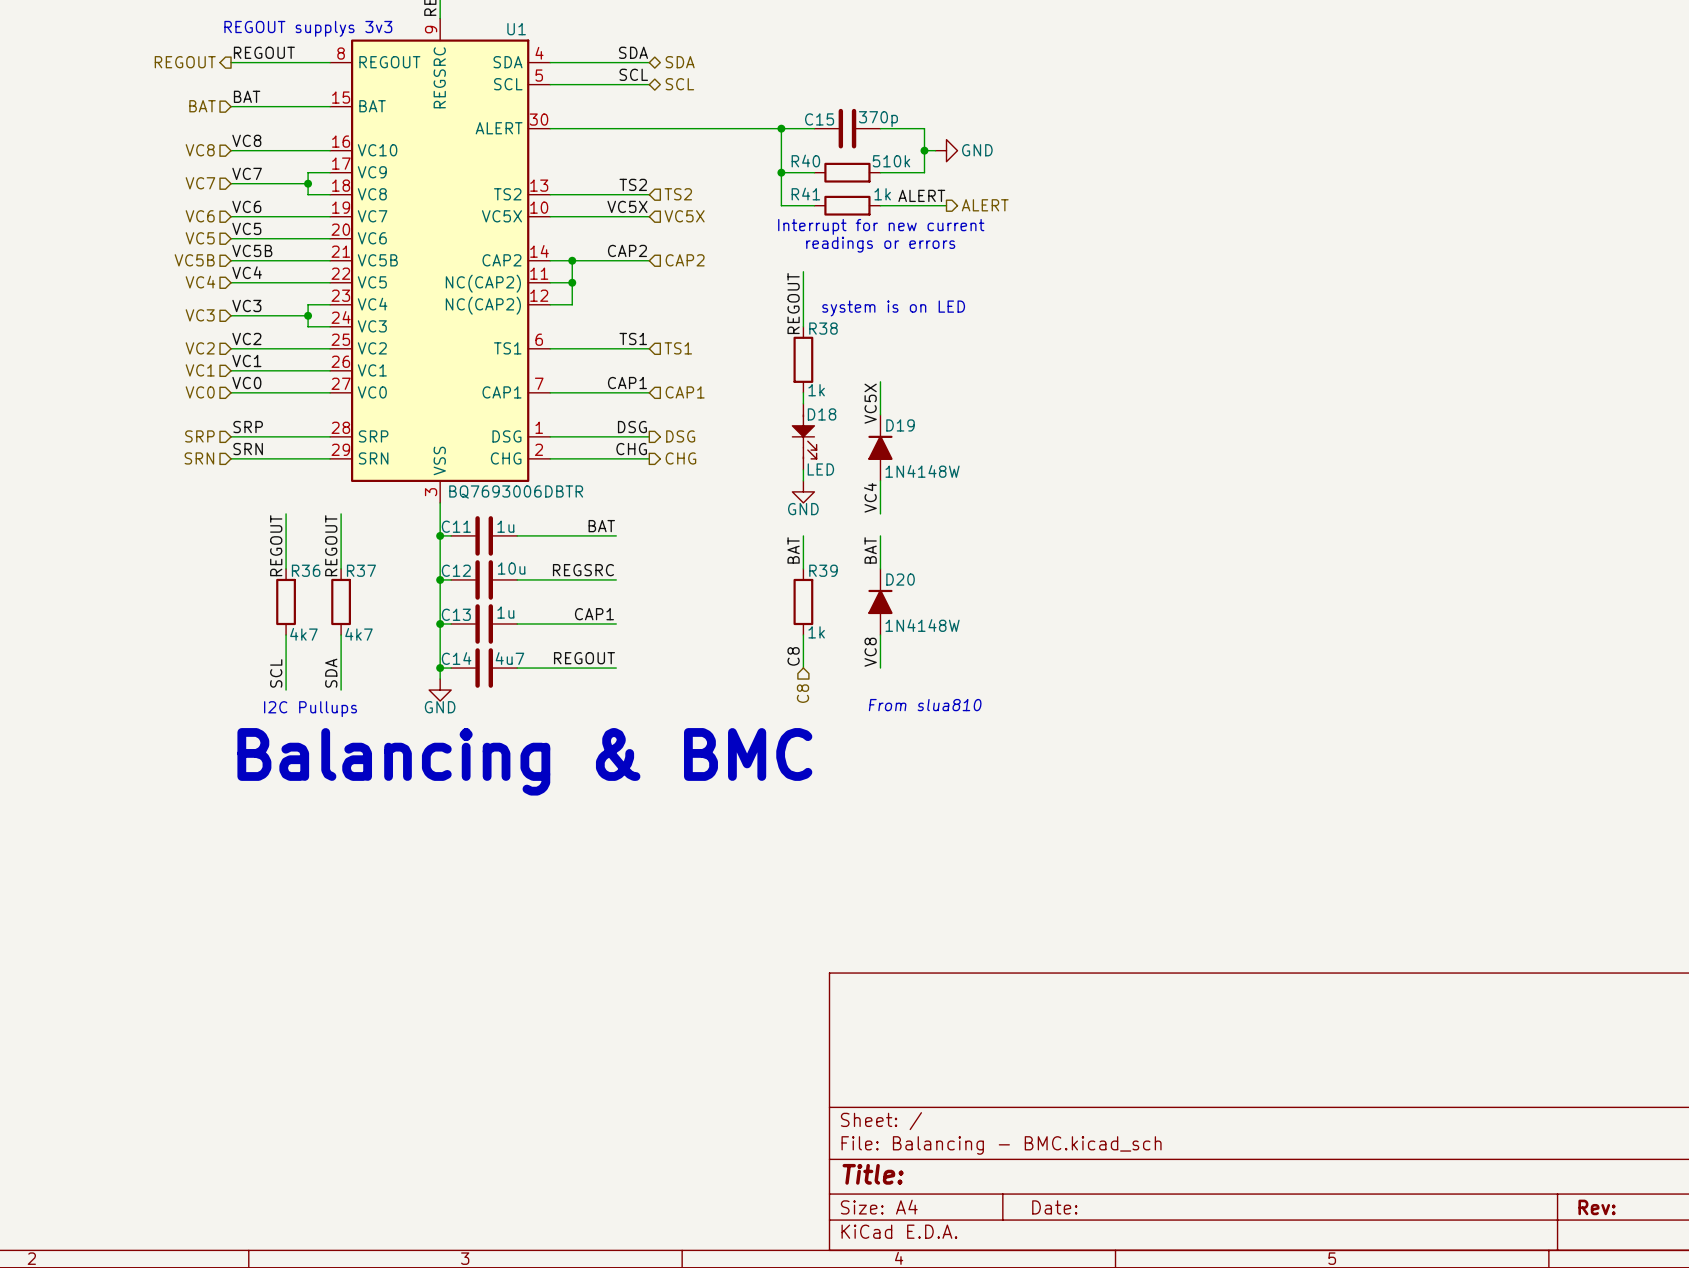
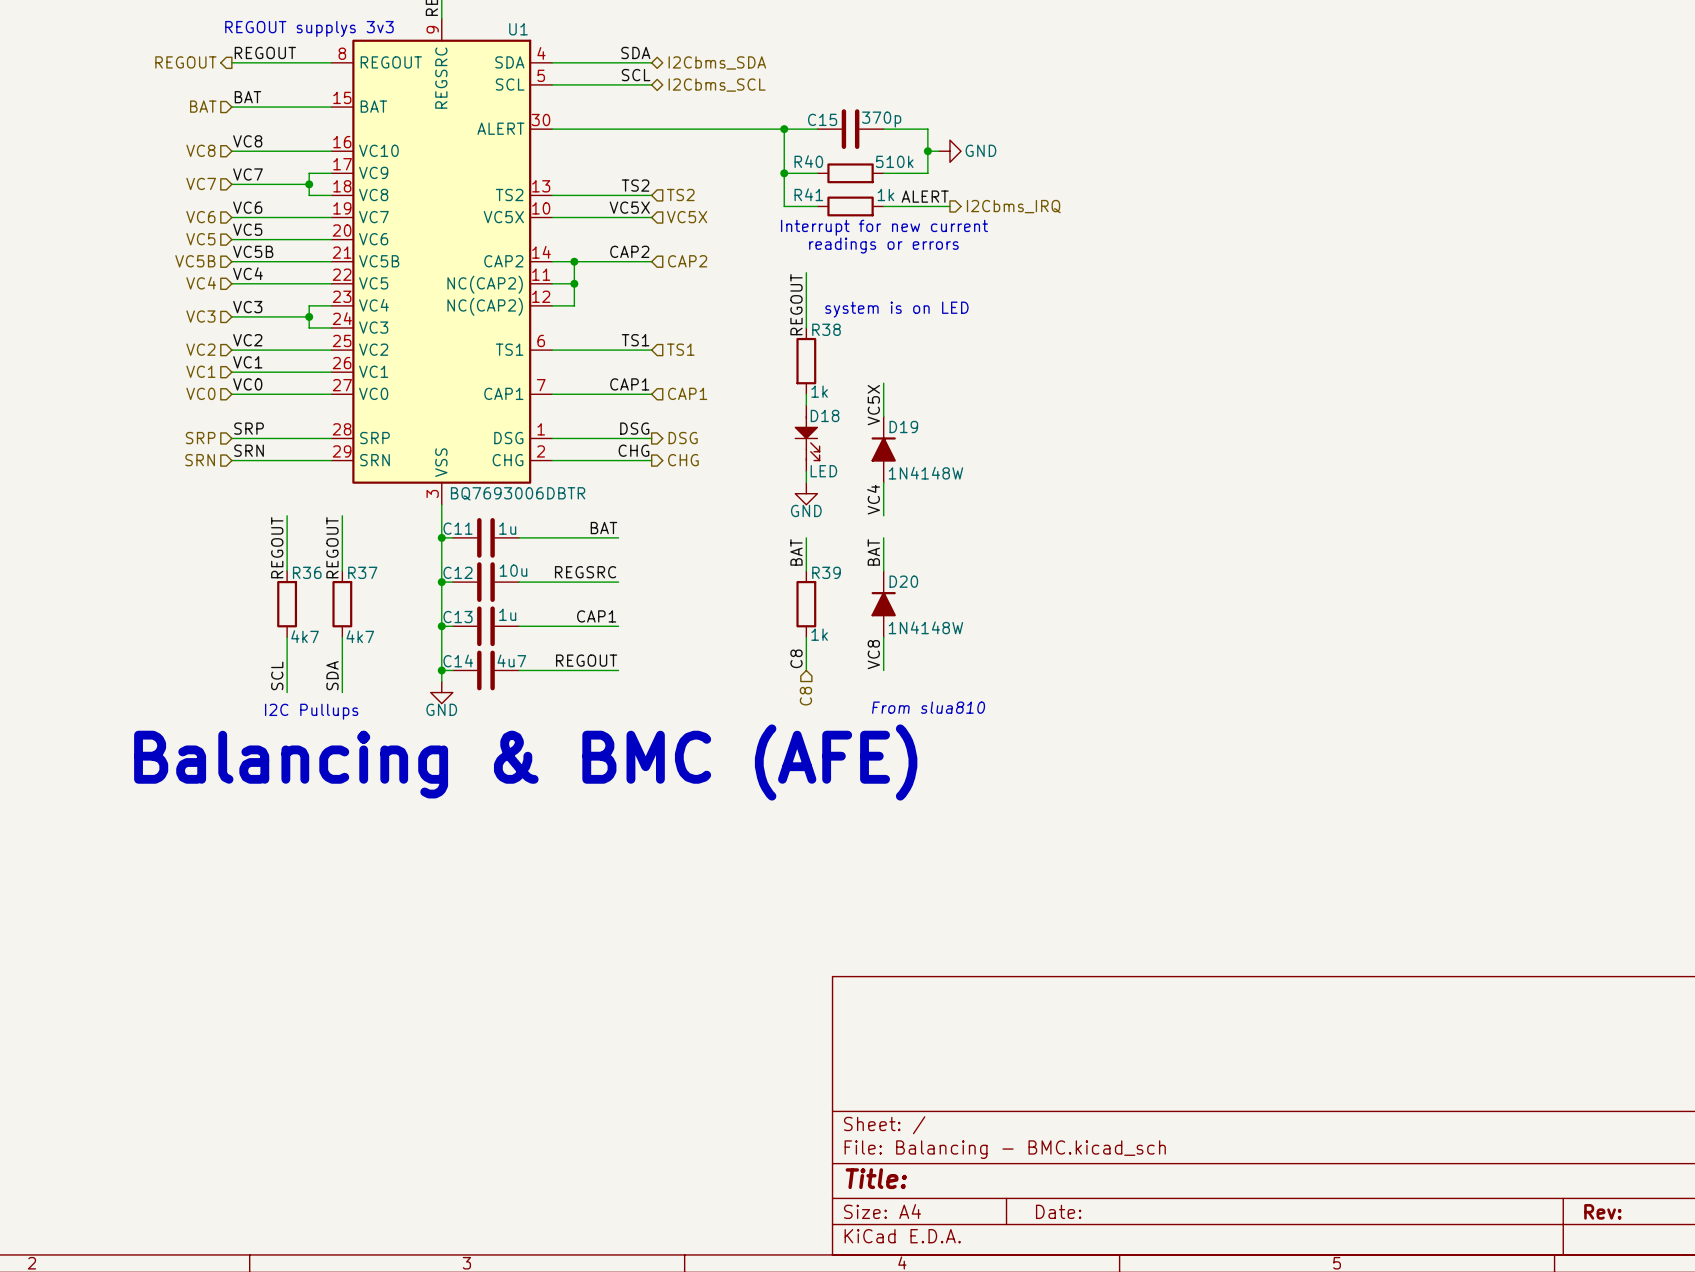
hierarchical label: SDA (680, 62) -> I2Cbms_SDA (717, 62)
hierarchical label: SCL (679, 84) -> I2Cbms_SCL (717, 85)
hierarchical label: ALERT (985, 205) -> I2Cbms_IRQ (1013, 206)
text: Balancing & BMC (524, 761) -> Balancing & BMC (AFE) (525, 762)

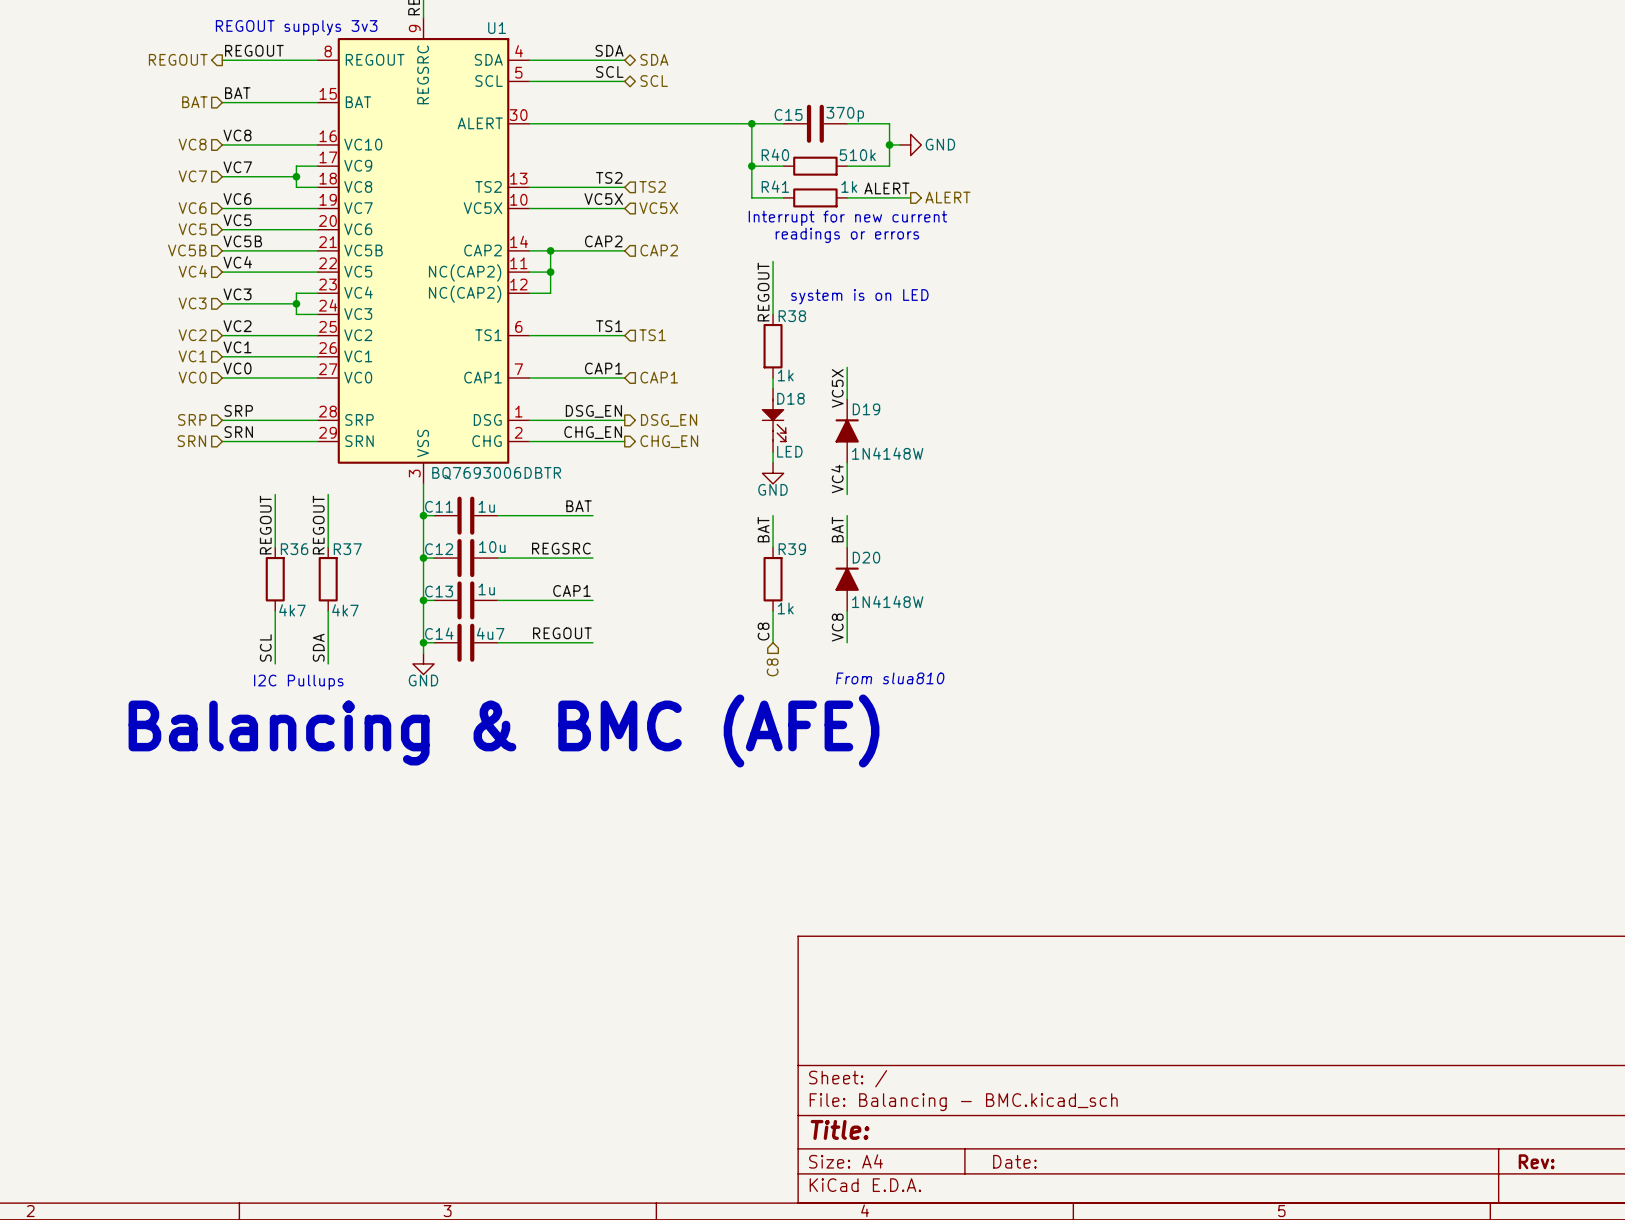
hierarchical label: I2Cbms_SDA (717, 62) -> SDA (654, 59)
hierarchical label: I2Cbms_SCL (717, 85) -> SCL (654, 81)
hierarchical label: I2Cbms_IRQ (1013, 206) -> ALERT (947, 197)
label: DSG (634, 428) -> DSG_EN (593, 411)
hierarchical label: DSG (683, 438) -> DSG_EN (669, 420)
label: CHG (633, 450) -> CHG_EN (593, 432)
hierarchical label: CHG (683, 460) -> CHG_EN (669, 441)

